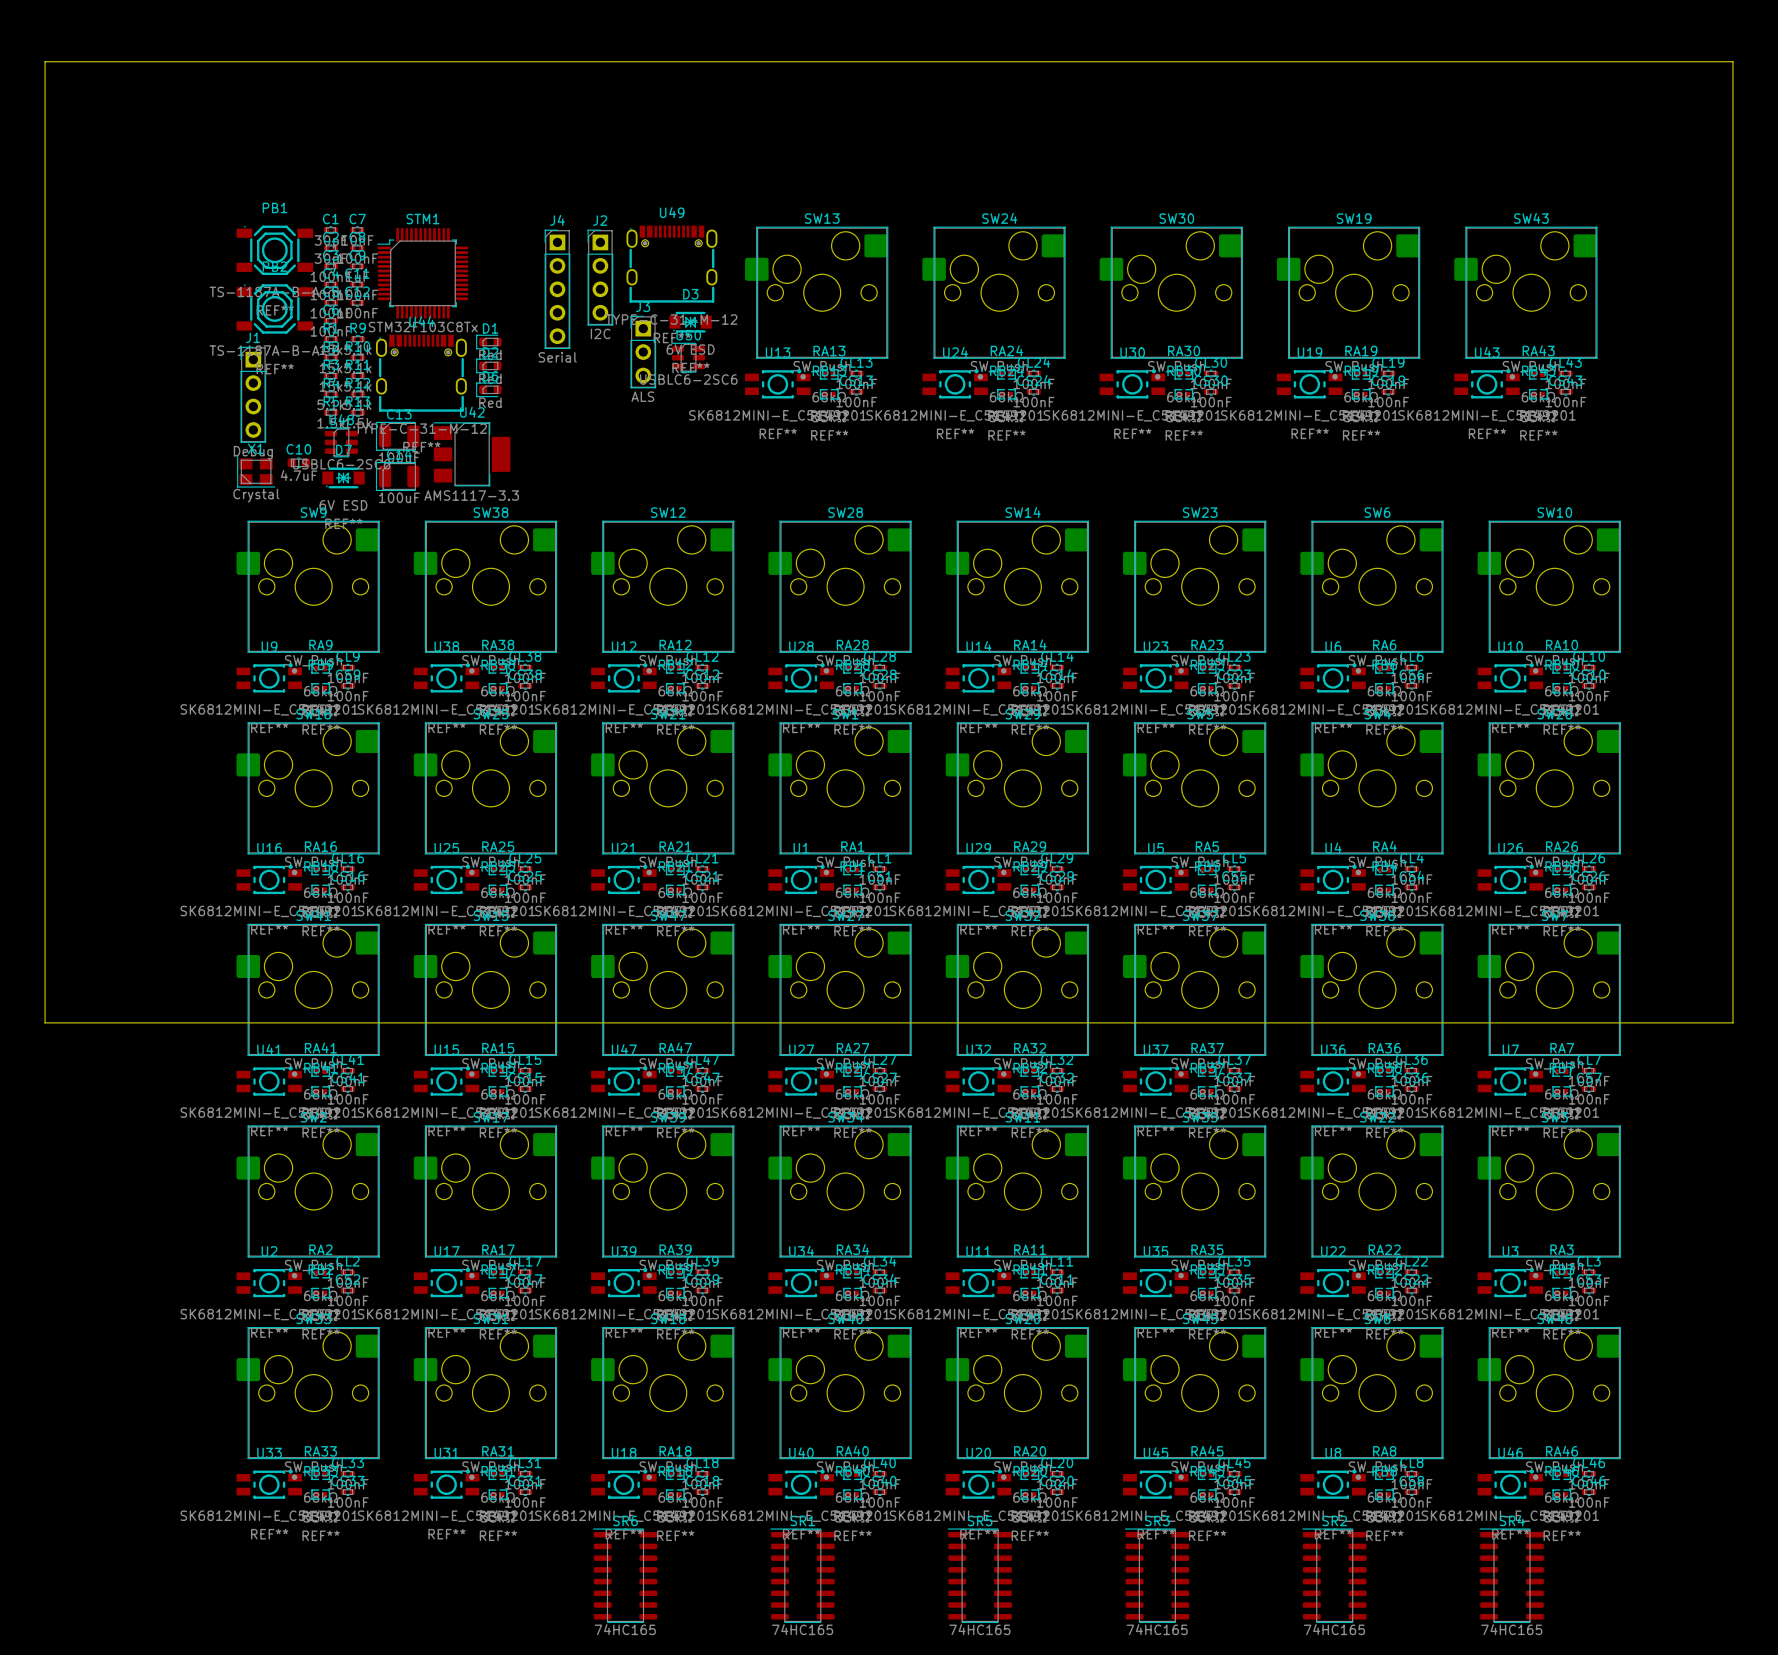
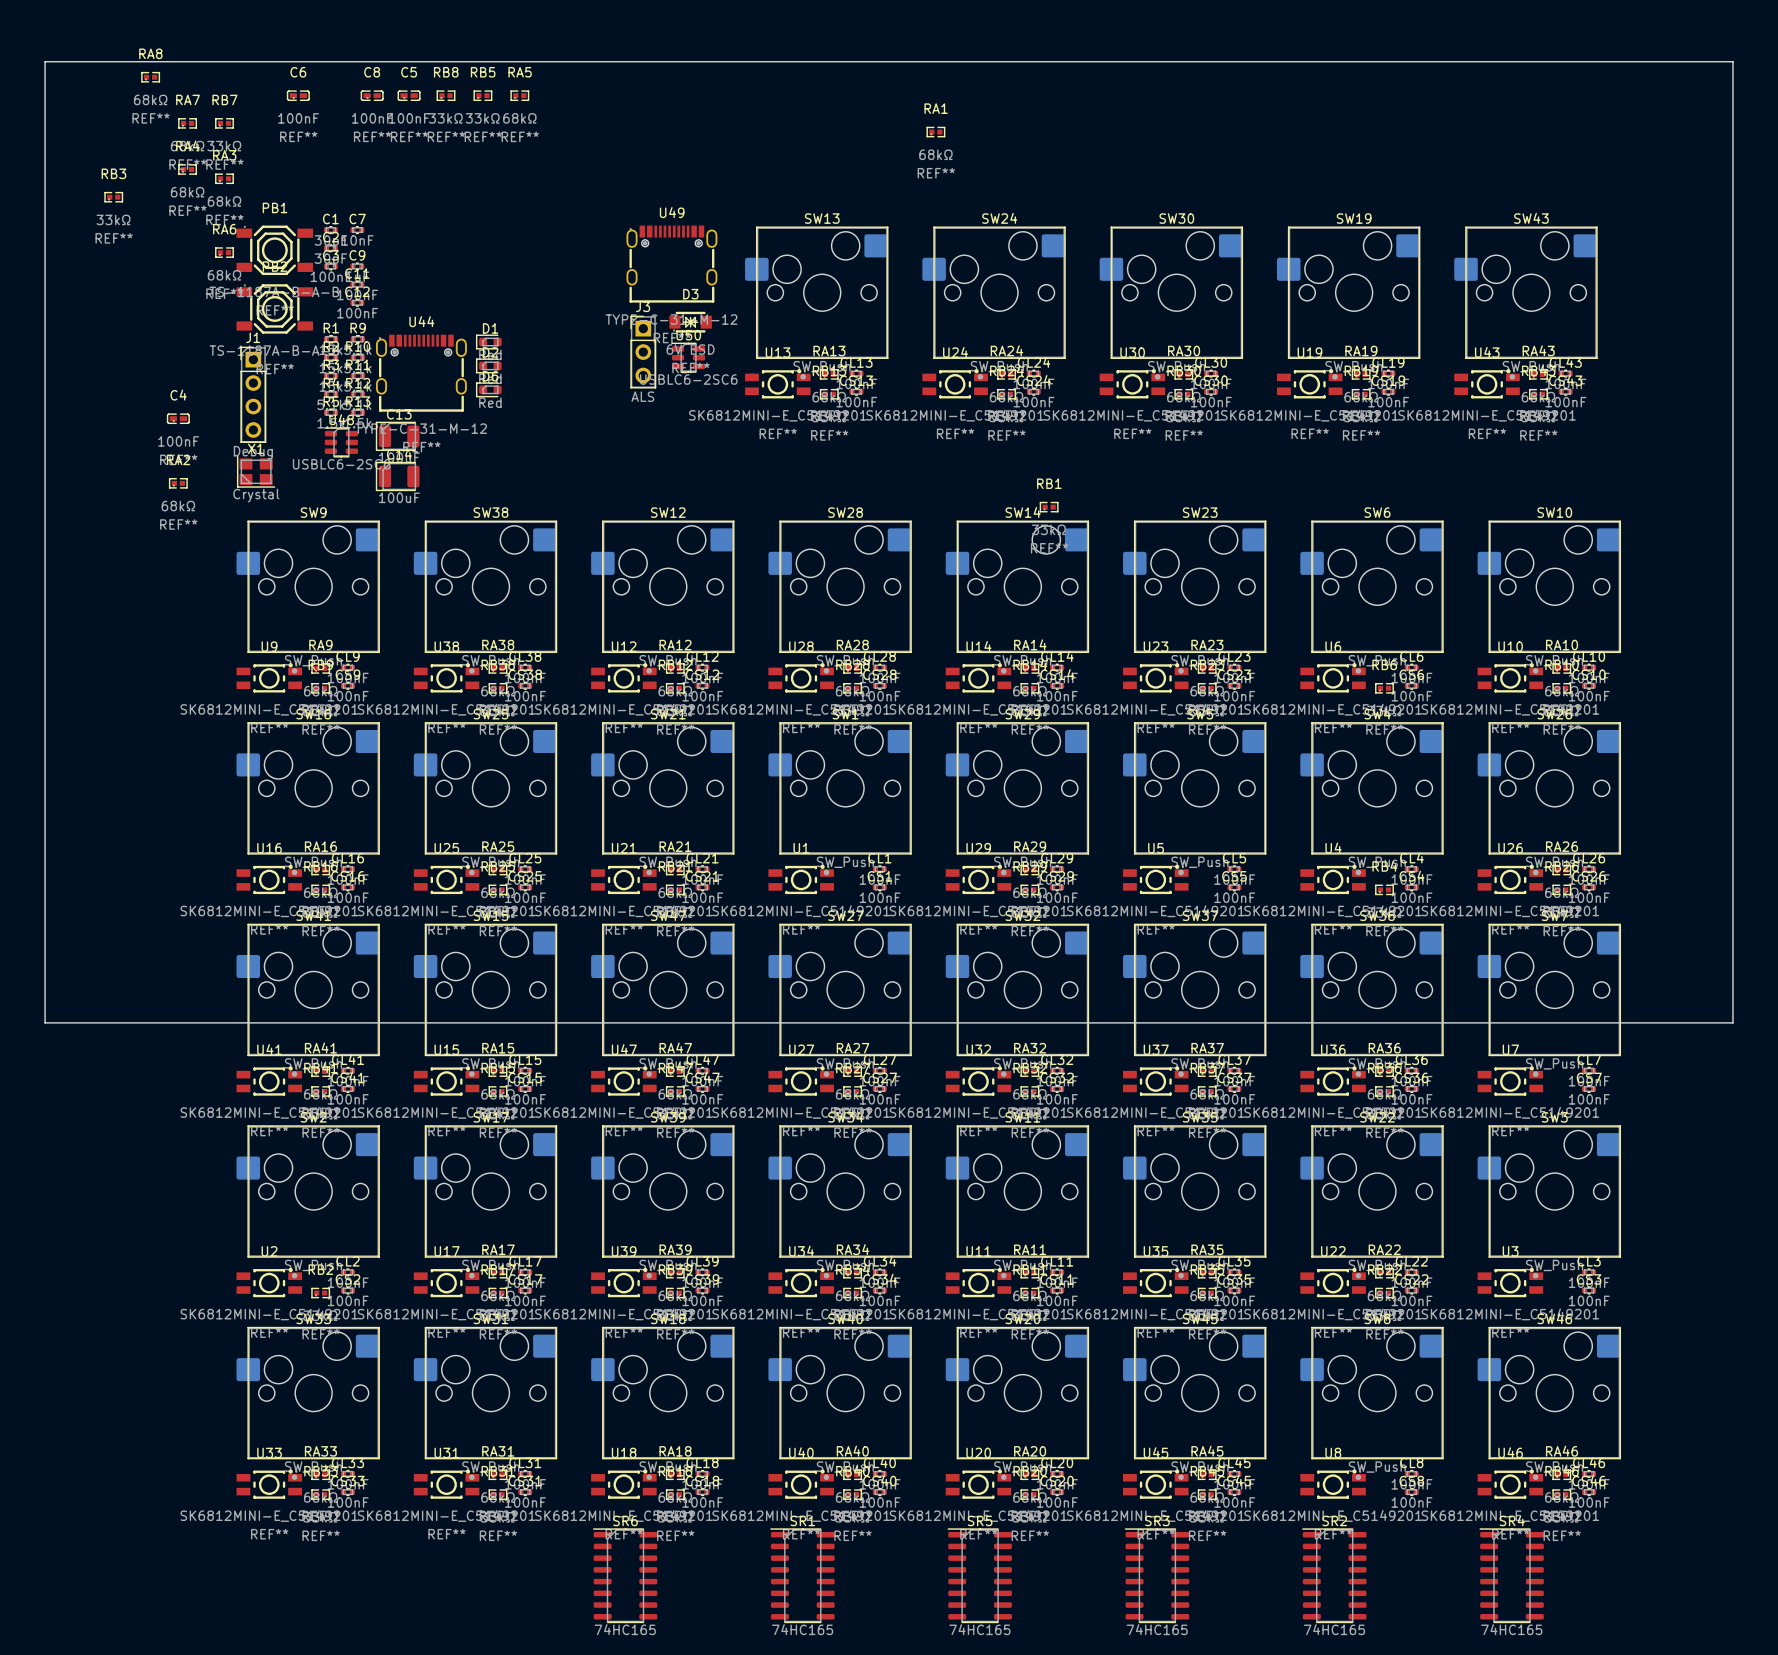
C8 footprint: [350, 244, 365, 253] -> [360, 90, 384, 101]
STM1: STM32F103C8Tx (422, 273) -> none
J2: I2C (600, 277) -> none
C4 footprint: [323, 280, 338, 289] -> [166, 413, 190, 425]
J4: Serial (557, 289) -> none
C5 footprint: [323, 298, 338, 307] -> [397, 90, 421, 101]
C6 footprint: [323, 317, 338, 325] -> [286, 90, 310, 101]
U42: AMS1117-3.3 (472, 454) -> none
C10: 4.7uF (298, 462) -> none
D7: 6V ESD (343, 477) -> none
RA6 position: (1384, 668) -> (224, 252)
RA1 position: (852, 870) -> (935, 132)
RA5 position: (1207, 870) -> (519, 95)
RA4 position: (1384, 870) -> (187, 169)
RB1 position: (852, 889) -> (1049, 507)
RB5 position: (1207, 889) -> (482, 95)
RA7 position: (1561, 1071) -> (187, 123)
RB7 position: (1561, 1091) -> (224, 123)
RA2 position: (320, 1273) -> (178, 483)
RA3 position: (1561, 1273) -> (224, 178)
RB3 position: (1561, 1293) -> (113, 197)
RA8 position: (1384, 1474) -> (150, 77)
RB8 position: (1384, 1494) -> (446, 95)

